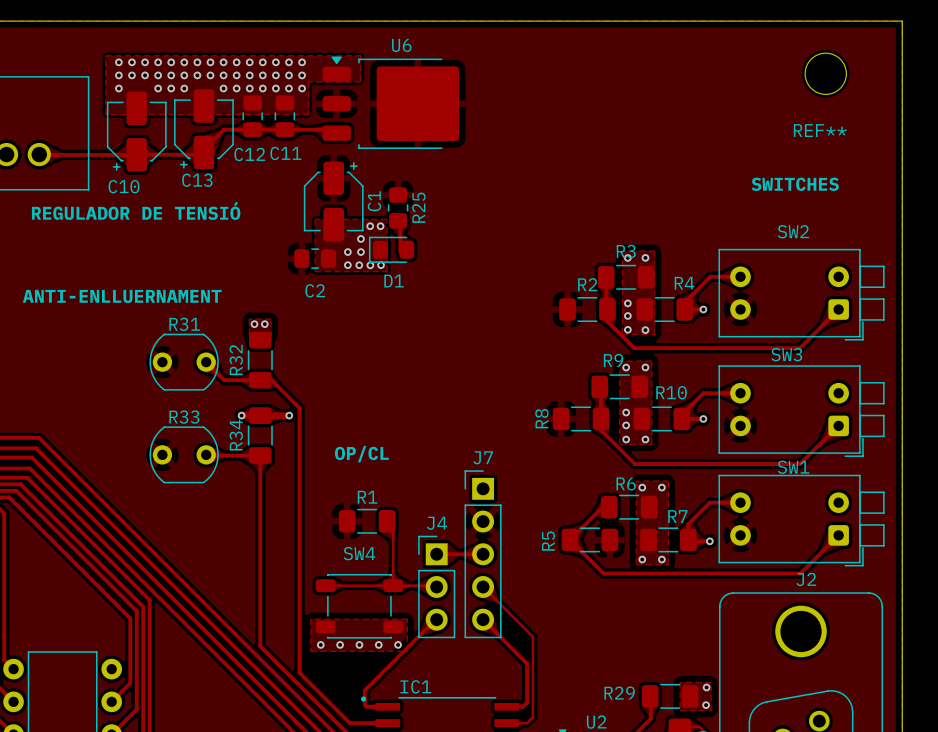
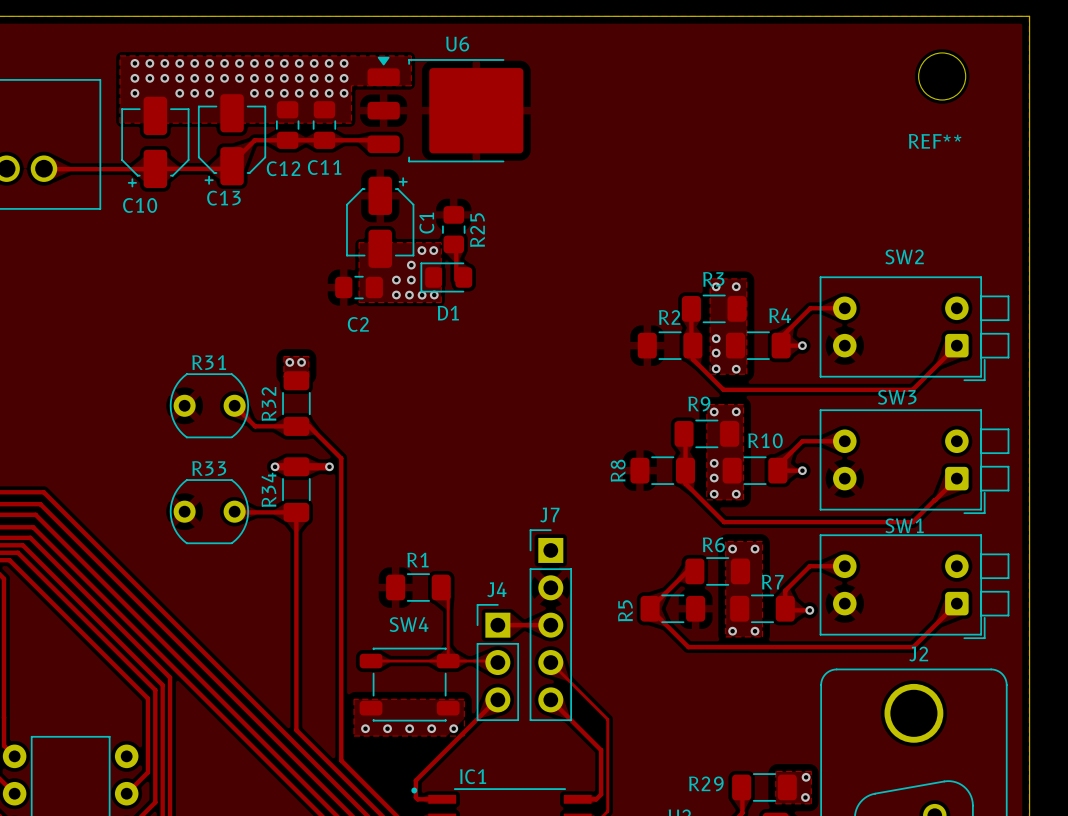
text: SWITCHES (795, 184) -> none
text: REGULADOR DE TENSIÓ (136, 210) -> none
text: ANTI-ENLLUERNAMENT (122, 296) -> none
text: OP/CL (361, 454) -> none

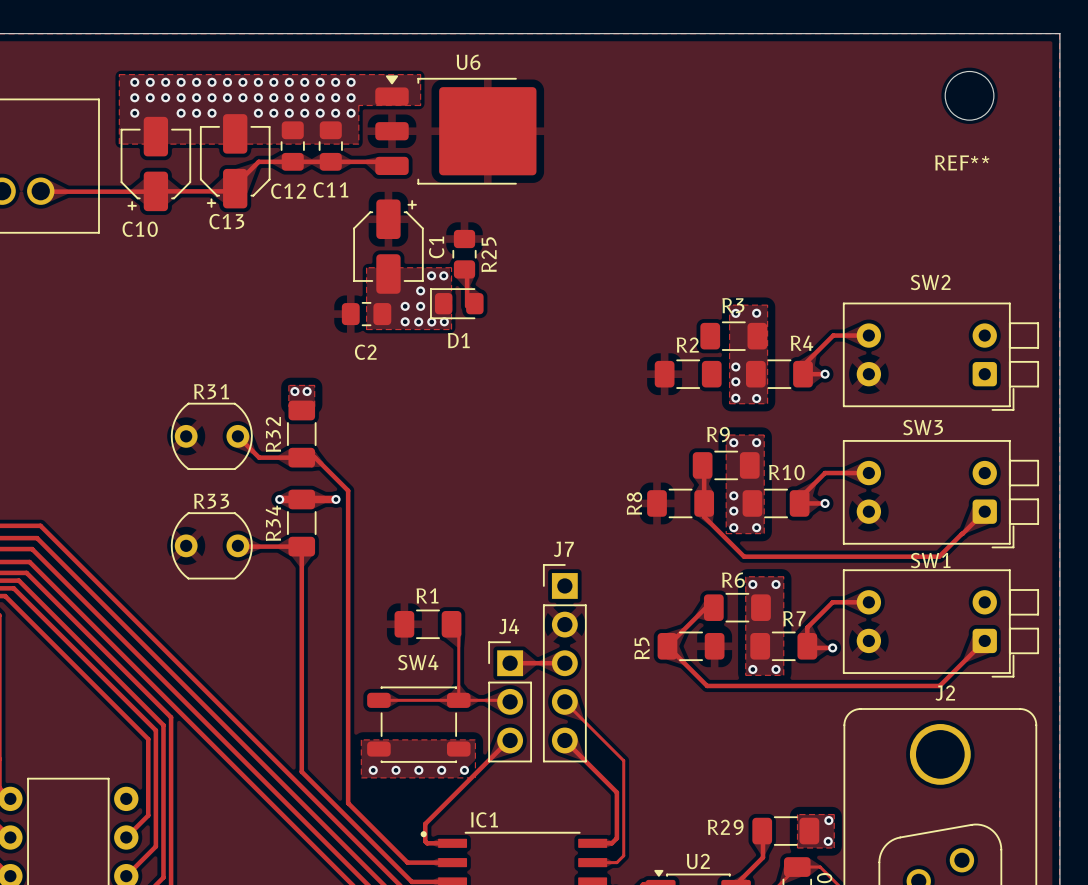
track: (691, 308) (692, 359) (723, 389) (912, 389) (956, 345) -> none

